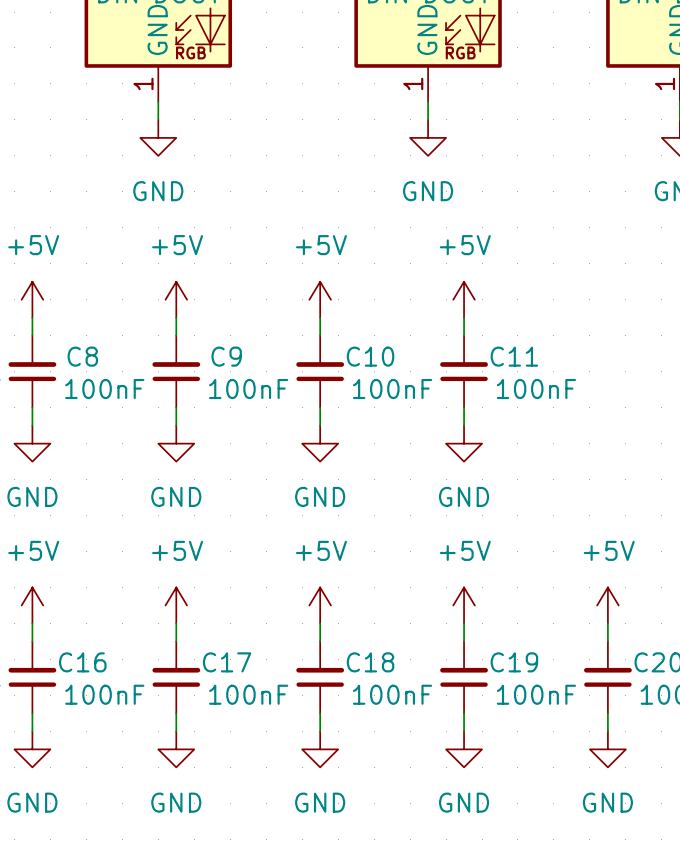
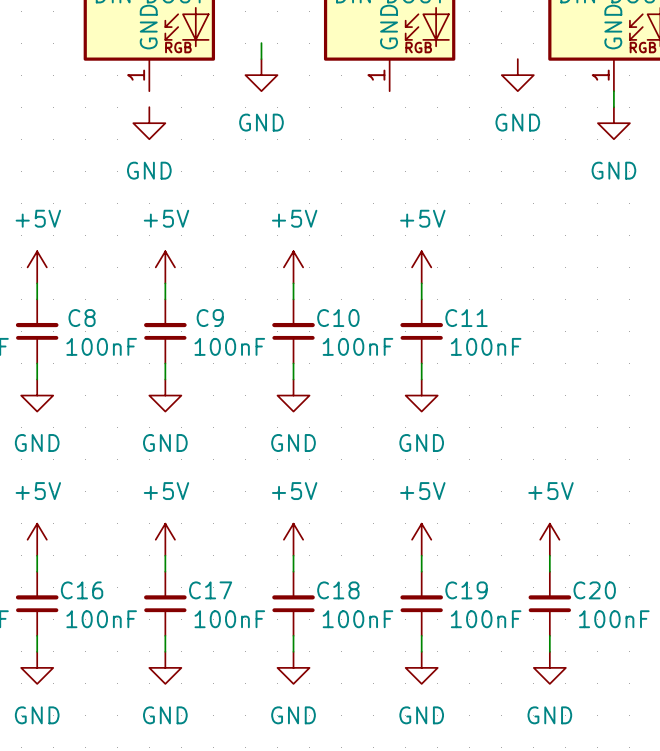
power symbol: none -> GND (261, 75)
power symbol: none -> GND (517, 75)
wire: (158, 101) (158, 119) -> (261, 43) (261, 59)
wire: (428, 101) (428, 119) -> none
power symbol: GND (428, 137) -> none

